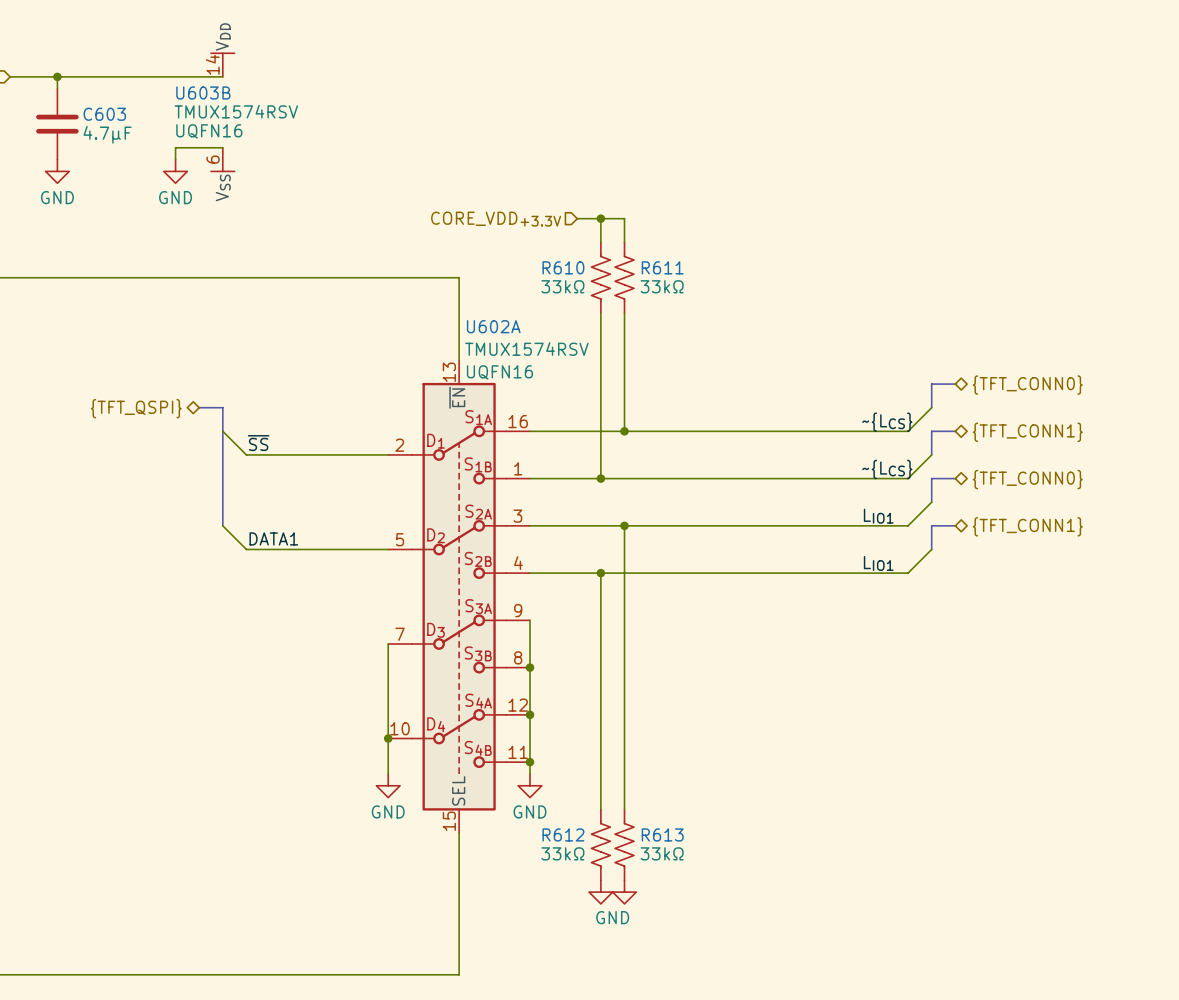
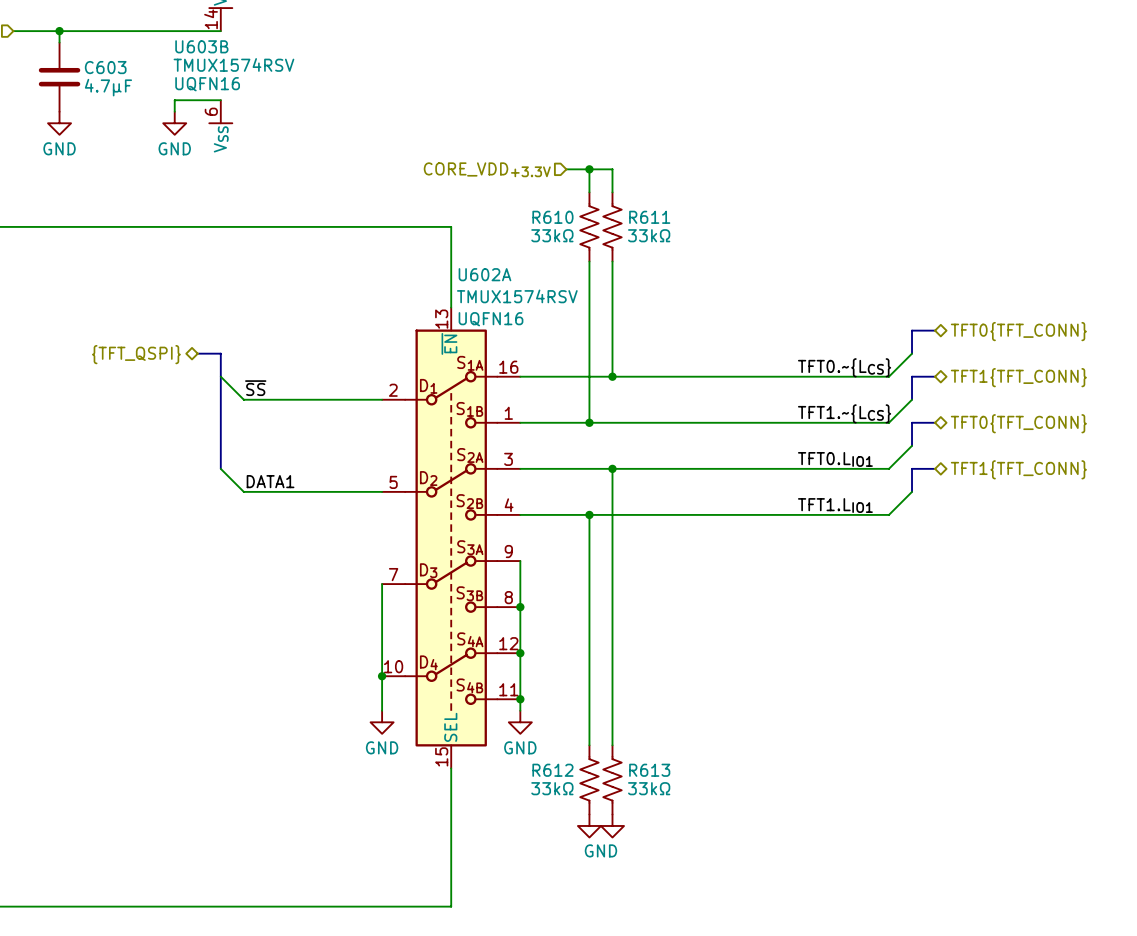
hierarchical label: {TFT_CONN0} (1027, 385) -> TFT0{TFT_CONN} (1018, 331)
label: ~{LCS} (887, 422) -> TFT0.~{LCS} (844, 367)
hierarchical label: {TFT_CONN1} (1027, 432) -> TFT1{TFT_CONN} (1018, 377)
label: ~{LCS} (887, 469) -> TFT1.~{LCS} (844, 413)
hierarchical label: {TFT_CONN0} (1027, 479) -> TFT0{TFT_CONN} (1018, 423)
label: LIO1 (878, 516) -> TFT0.LIO1 (835, 459)
hierarchical label: {TFT_CONN1} (1027, 526) -> TFT1{TFT_CONN} (1018, 469)
label: LIO1 (878, 563) -> TFT1.LIO1 (835, 505)

